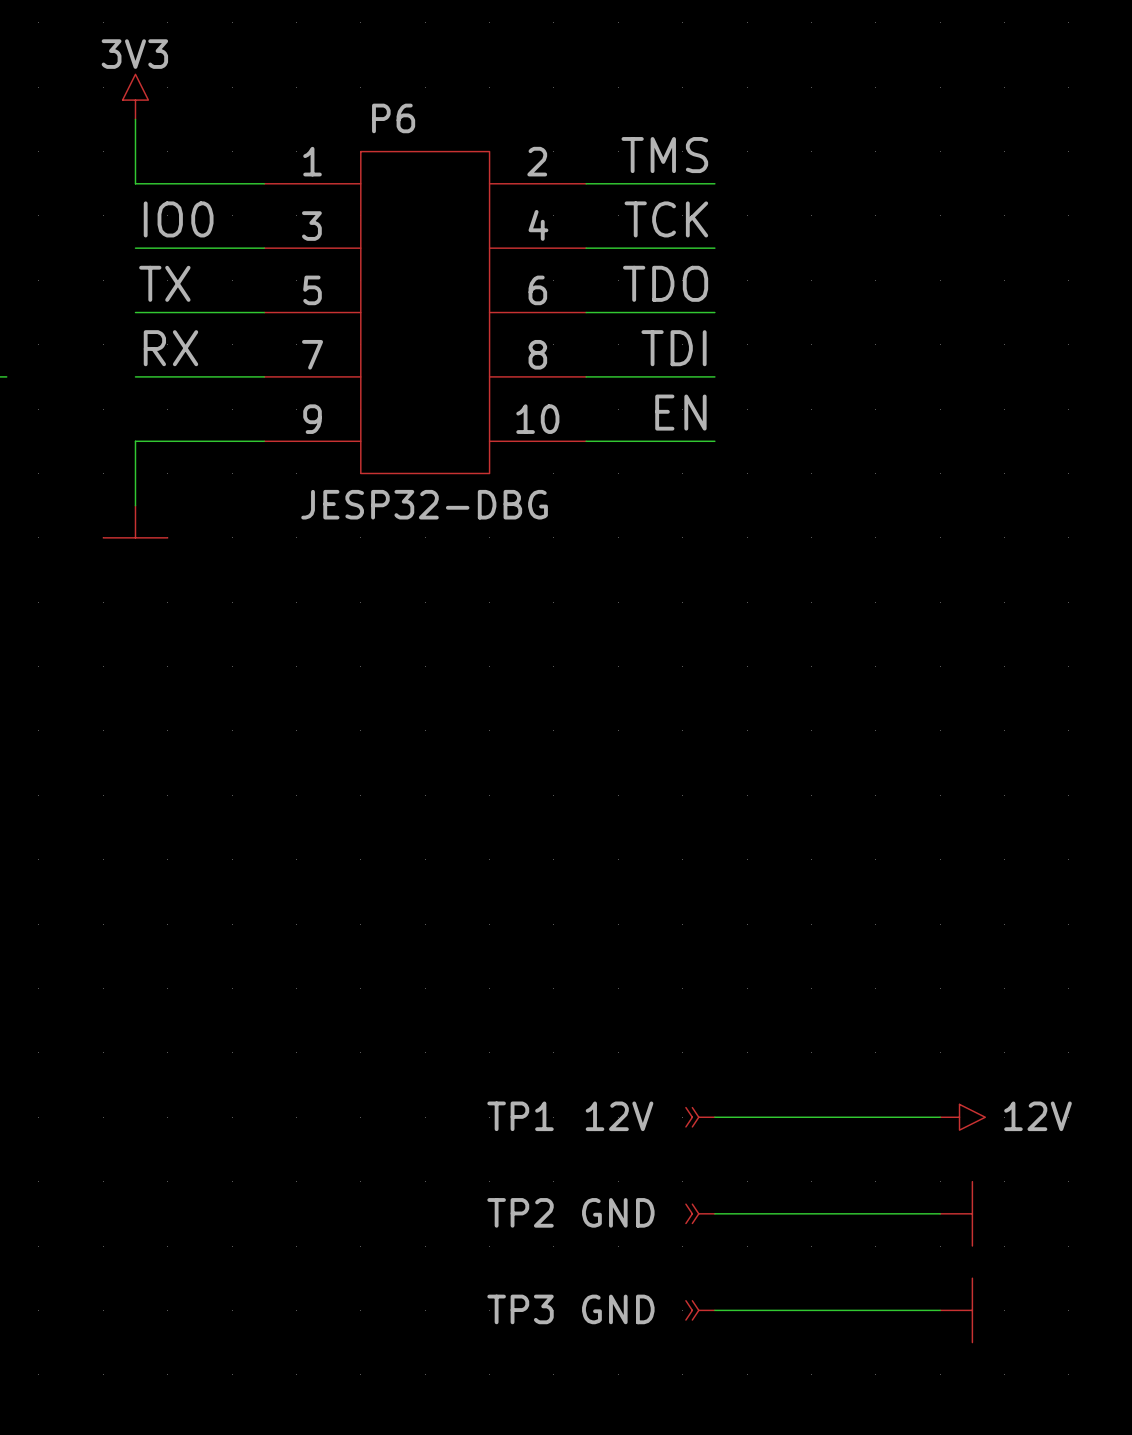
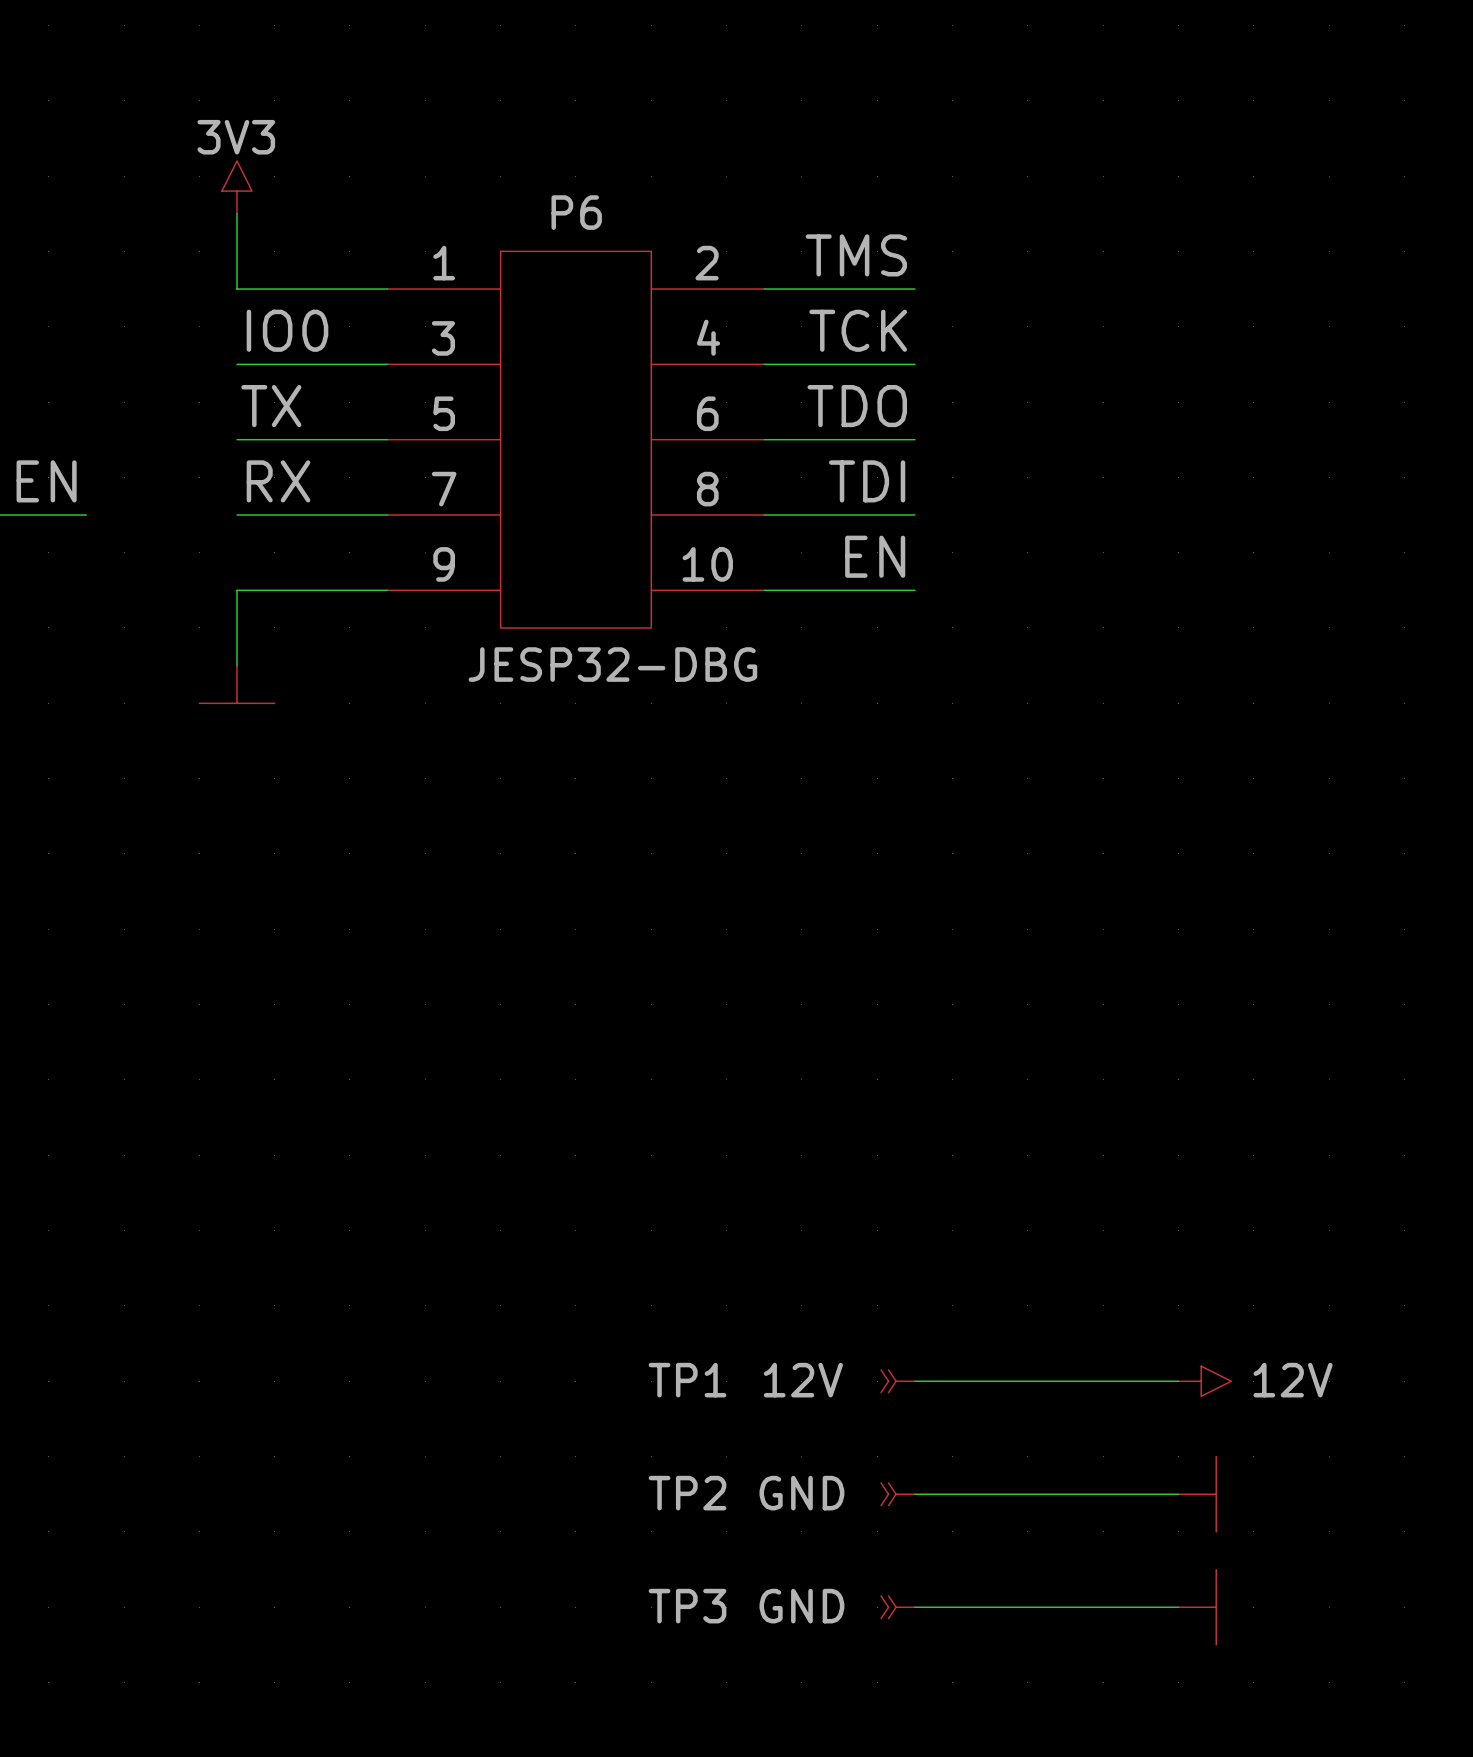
P6 name position: P6 (393, 118) -> P6 (576, 212)
P6 value position: JESP32-DBG (424, 504) -> JESP32-DBG (612, 664)

